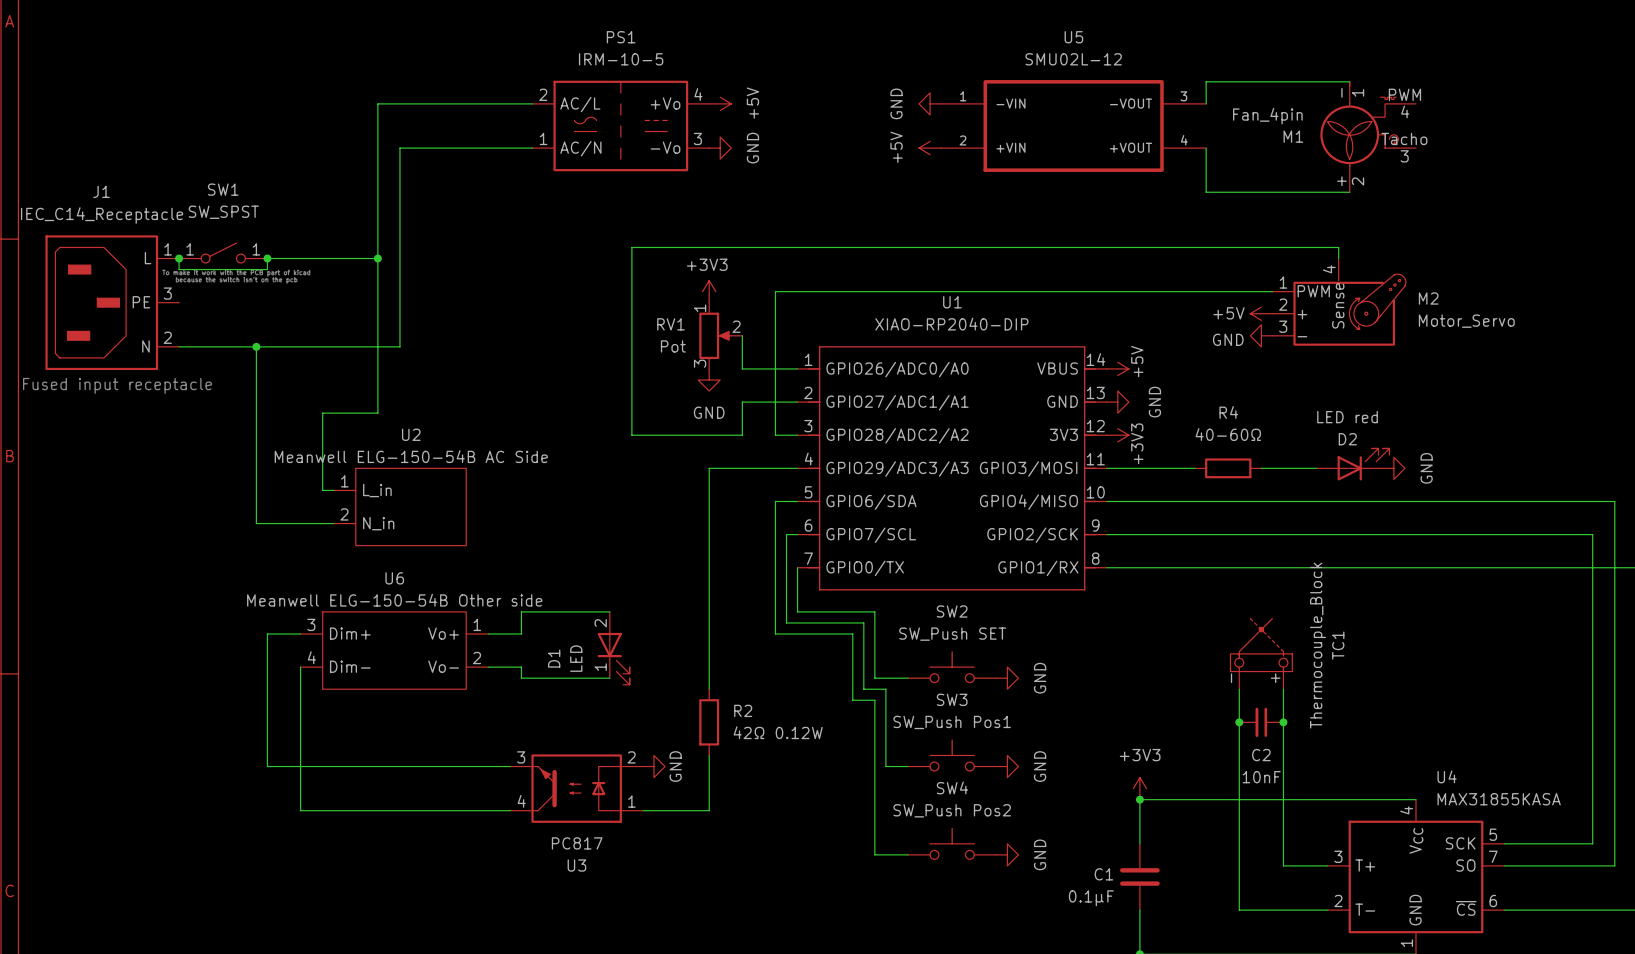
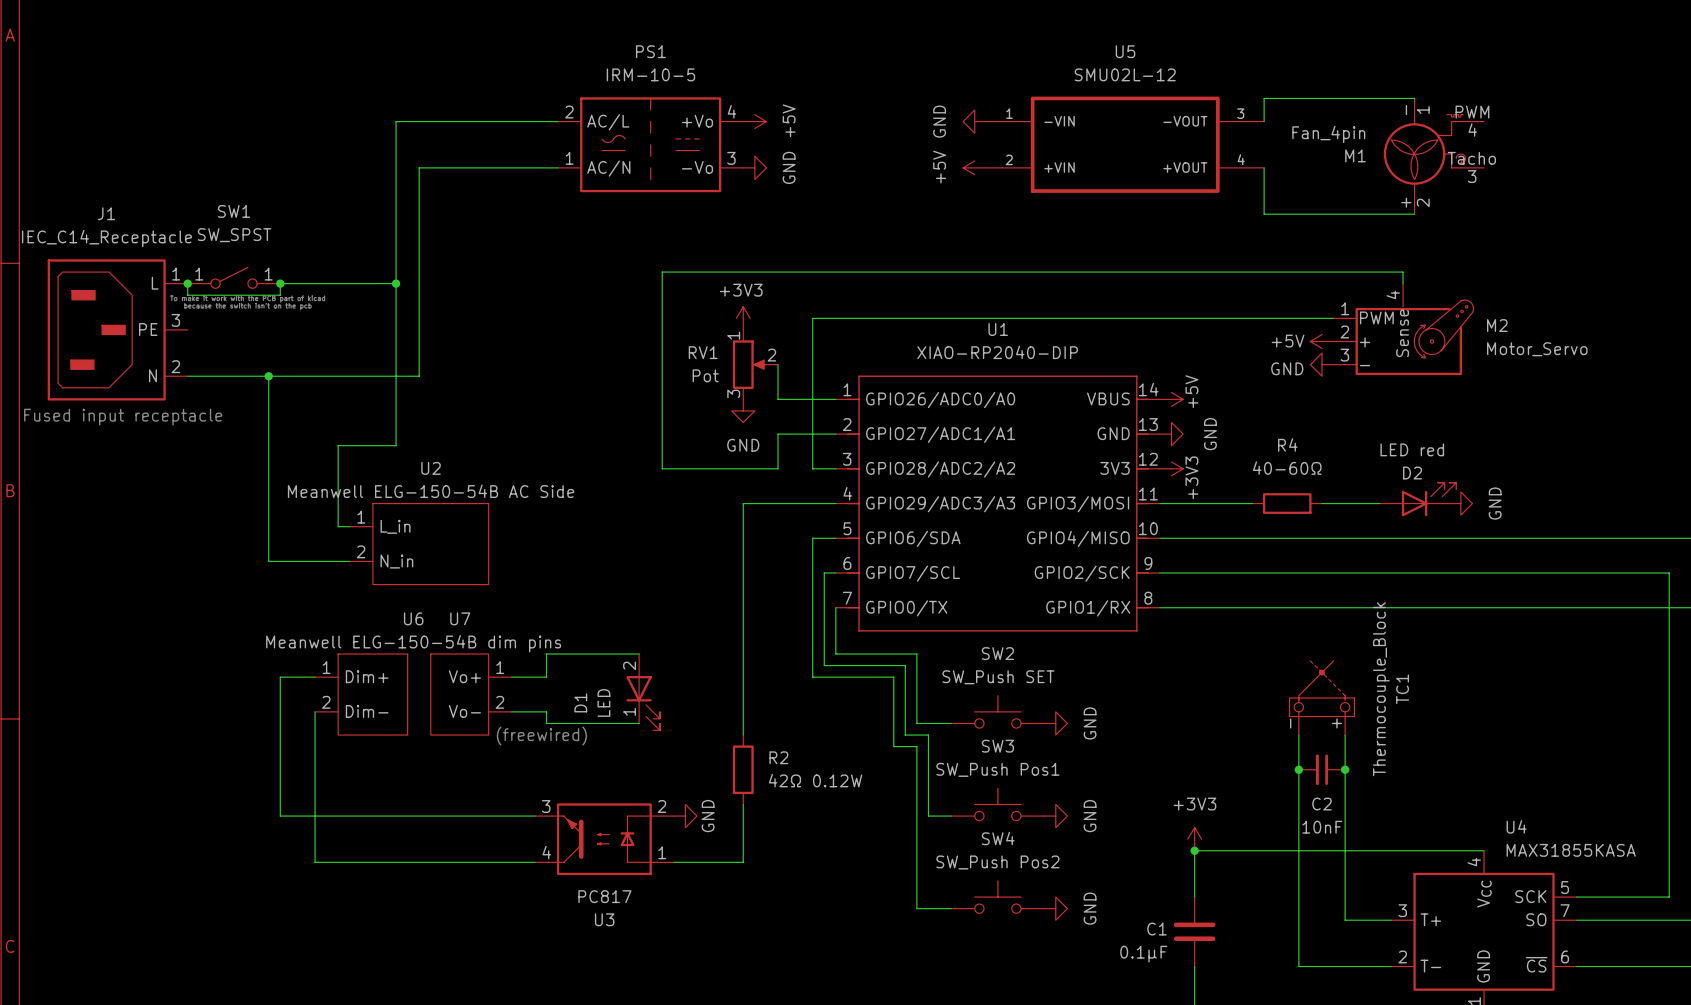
U6 value: Meanwell ELG-150-54B Other side (394, 600) -> Meanwell ELG-150-54B dim pins (413, 643)
U6 symbol: [300, 611, 489, 690] -> [315, 654, 408, 736]
U7: none -> (471, 694)
text: none -> (freewired) (541, 736)

